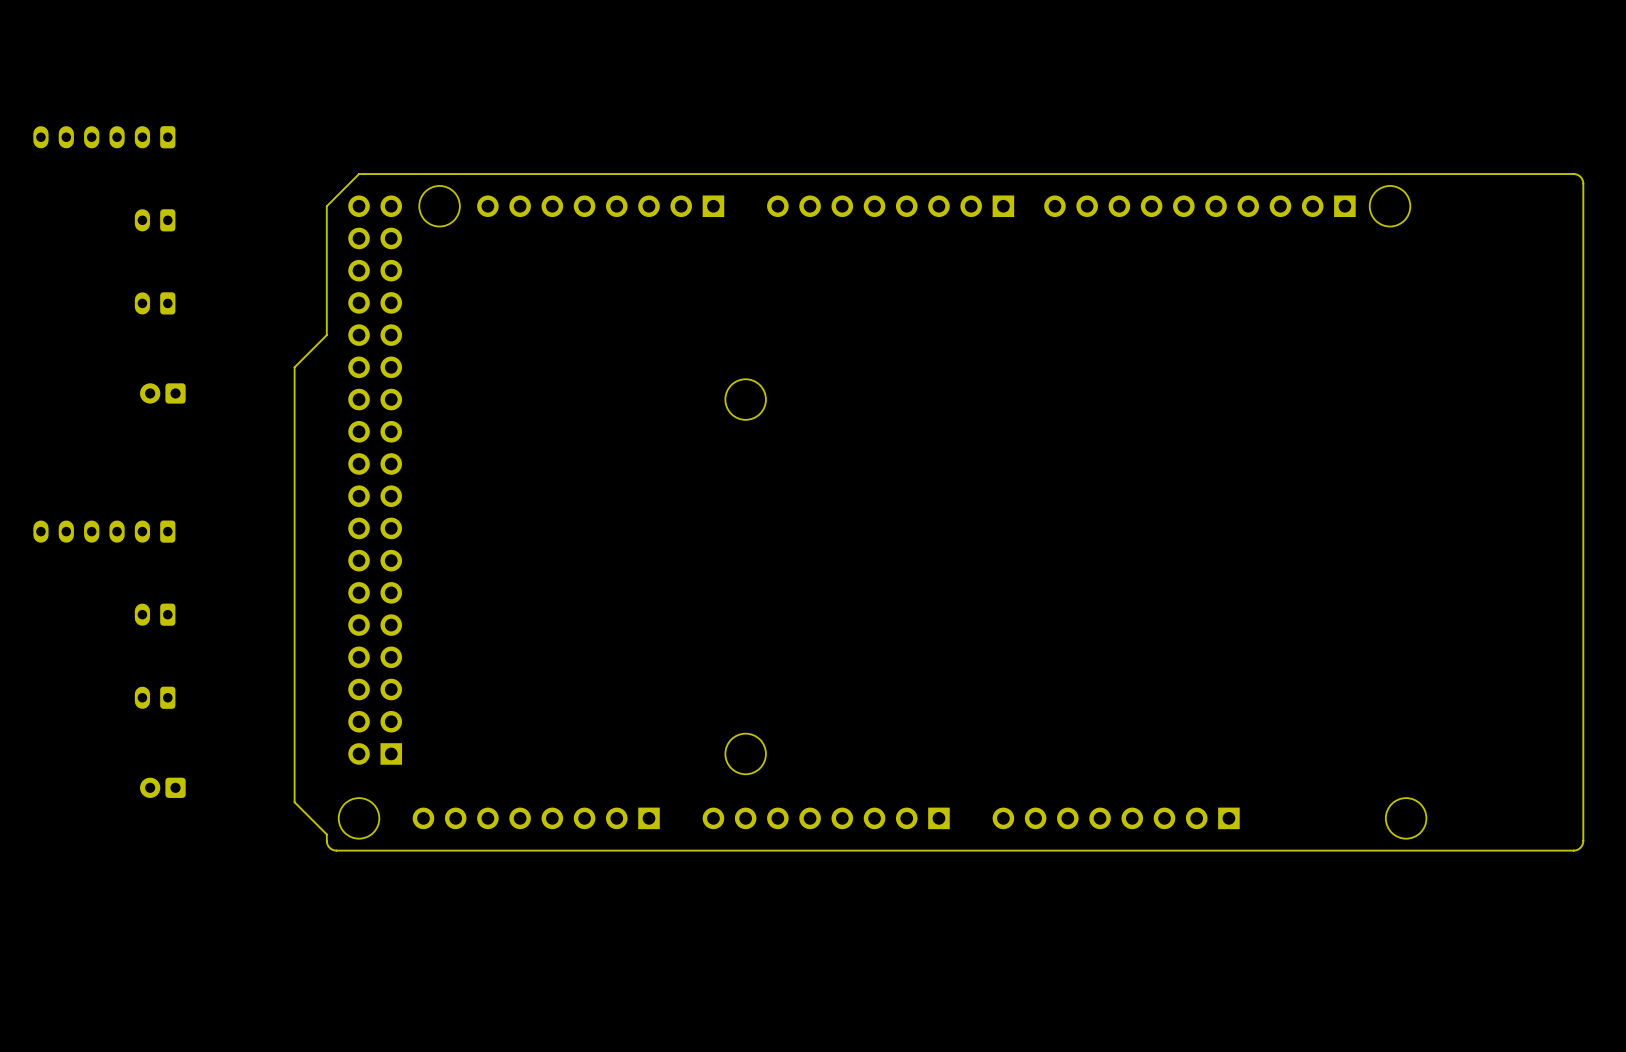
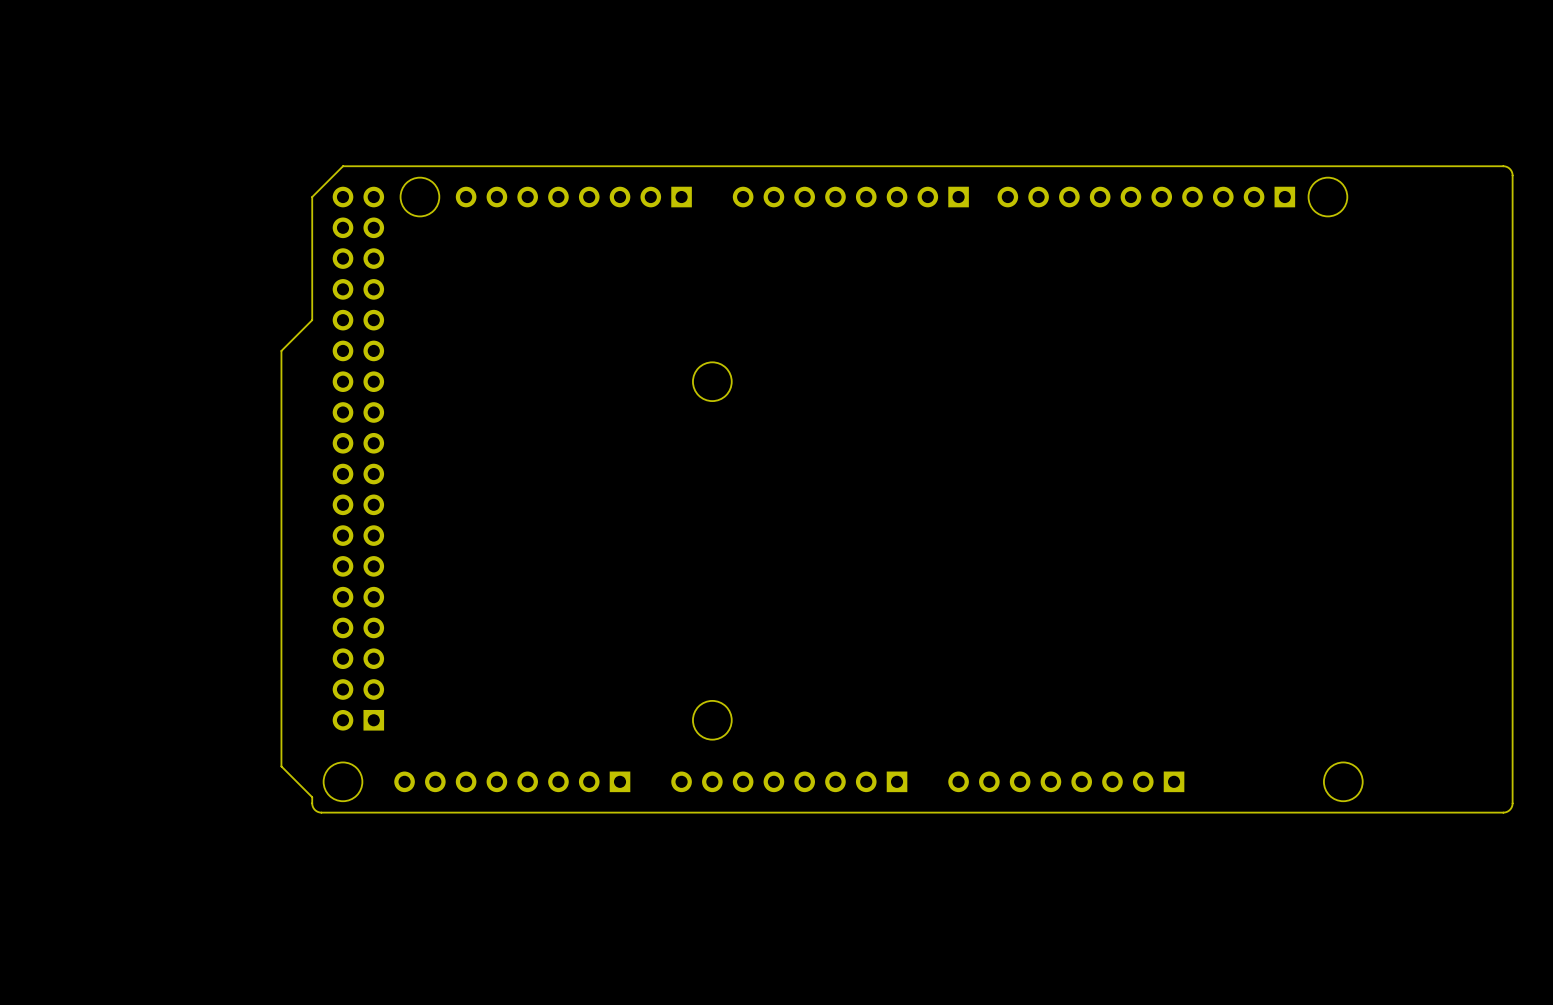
part: (104, 137) -> none
part: (155, 220) -> none
part: (155, 303) -> none
part: (162, 393) -> none
part: (104, 531) -> none
part: (155, 614) -> none
part: (155, 697) -> none
part: (162, 787) -> none

